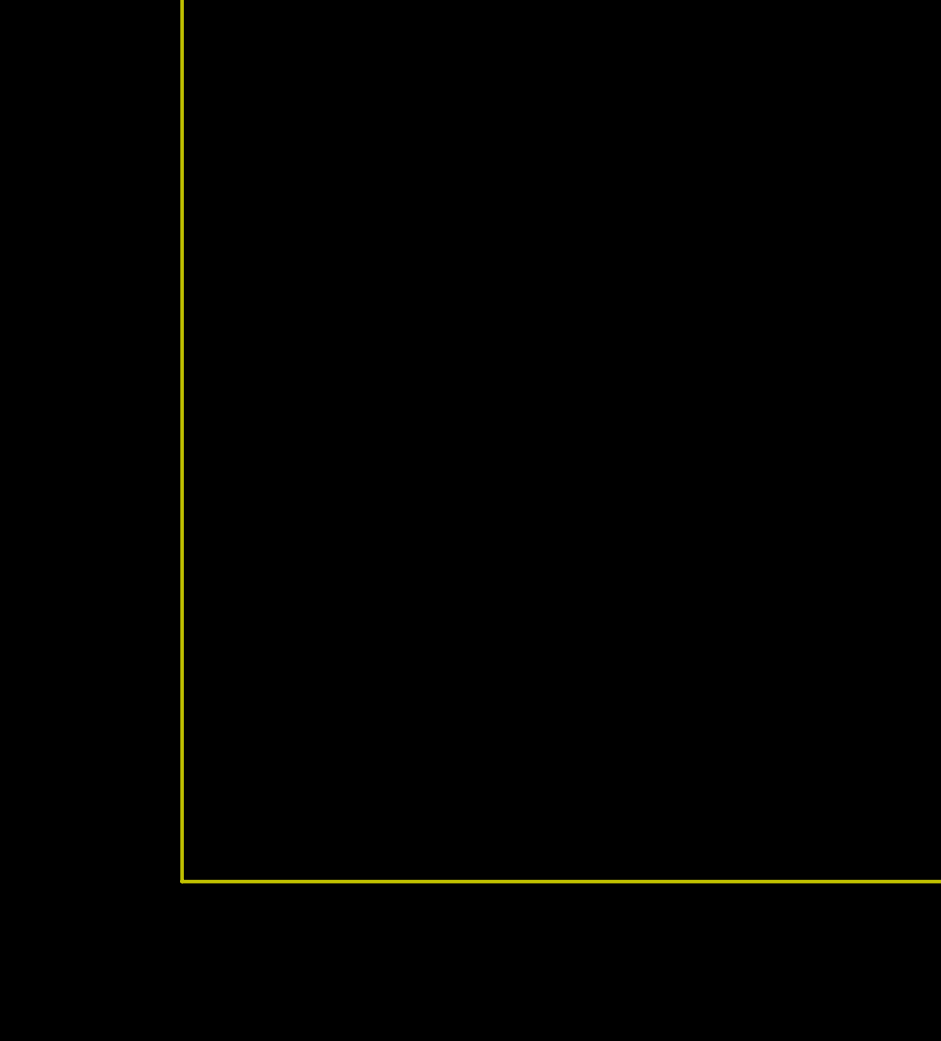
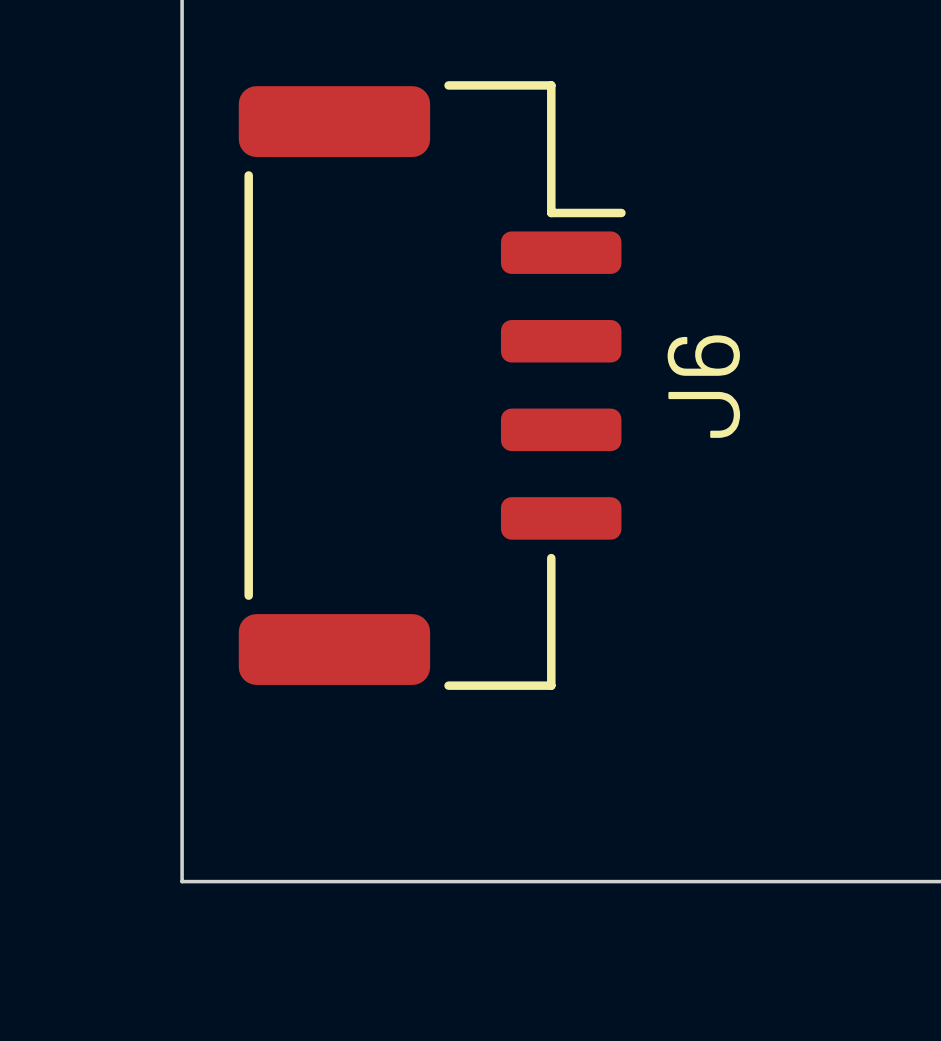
J6: none -> (432, 385)

